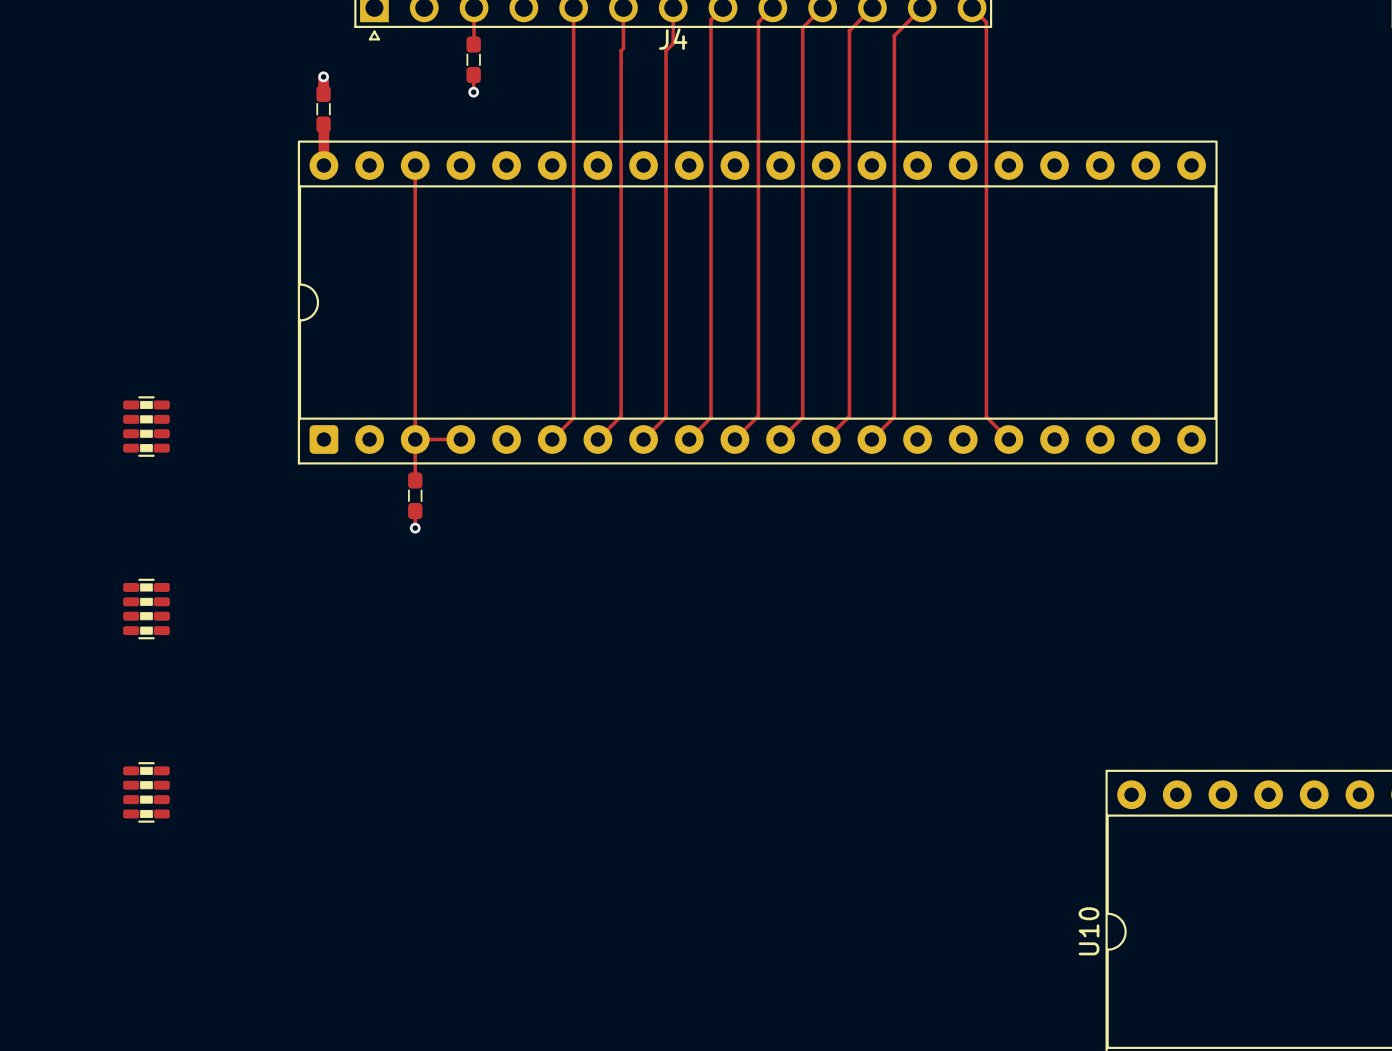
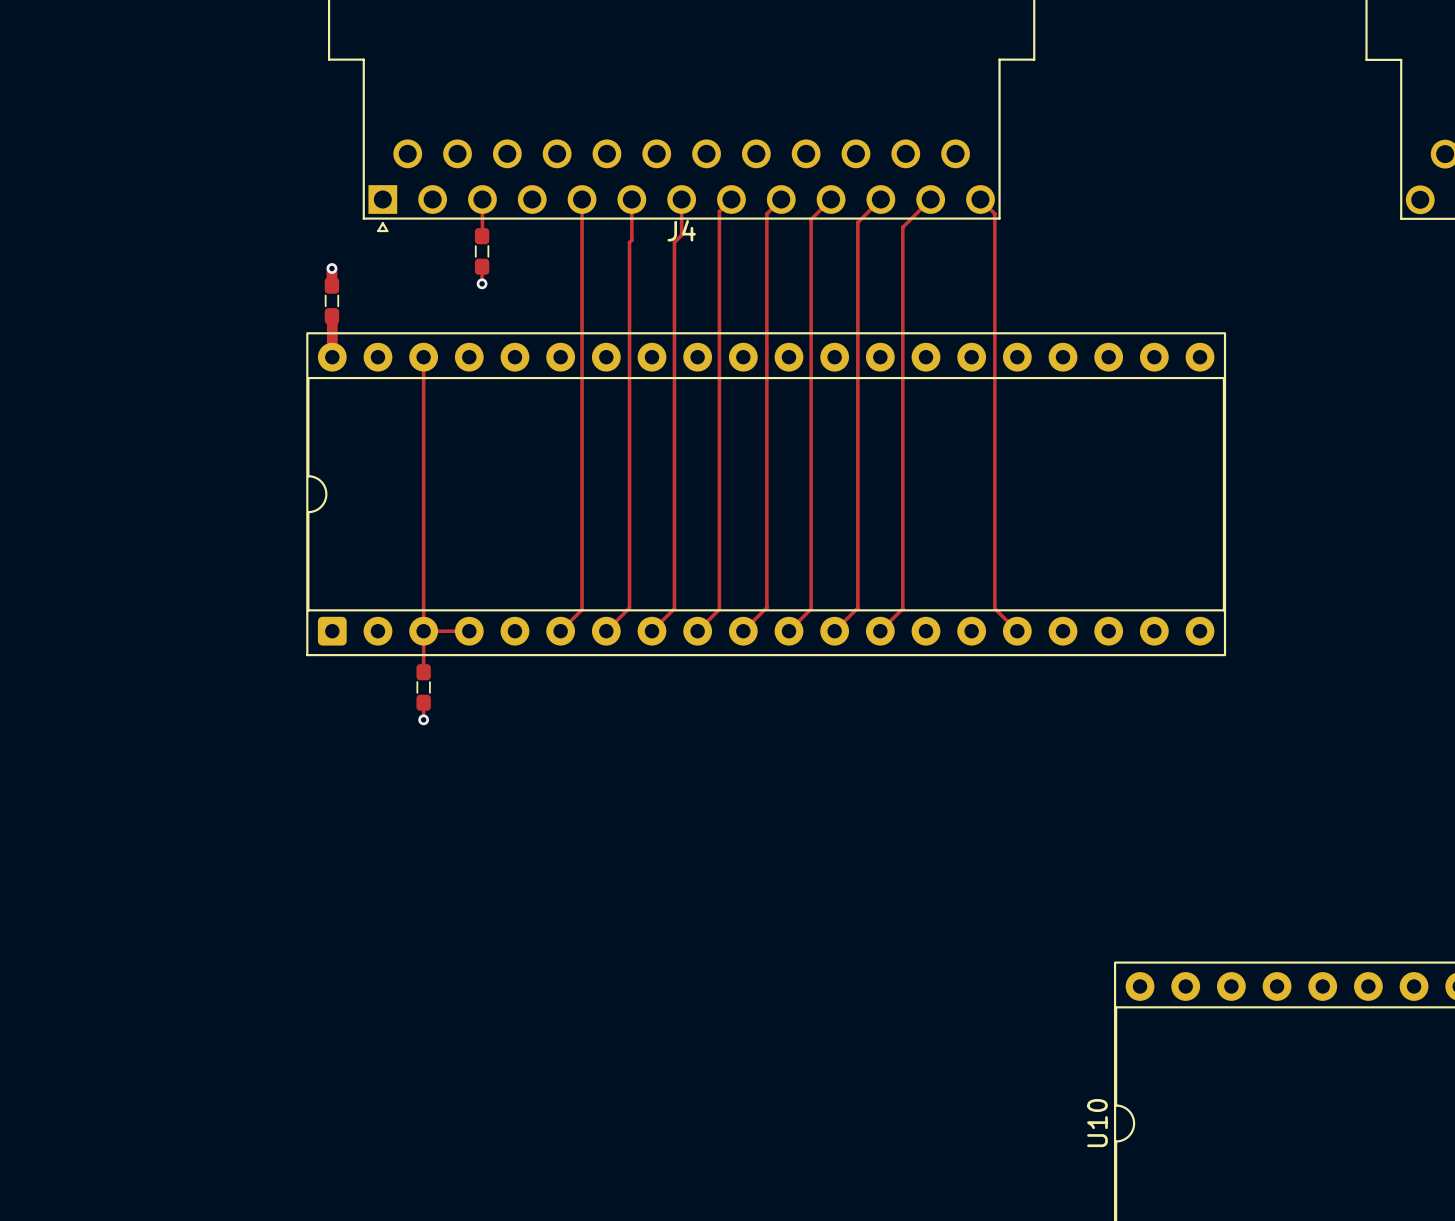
part: (146, 426) -> none
part: (146, 609) -> none
part: (146, 792) -> none

